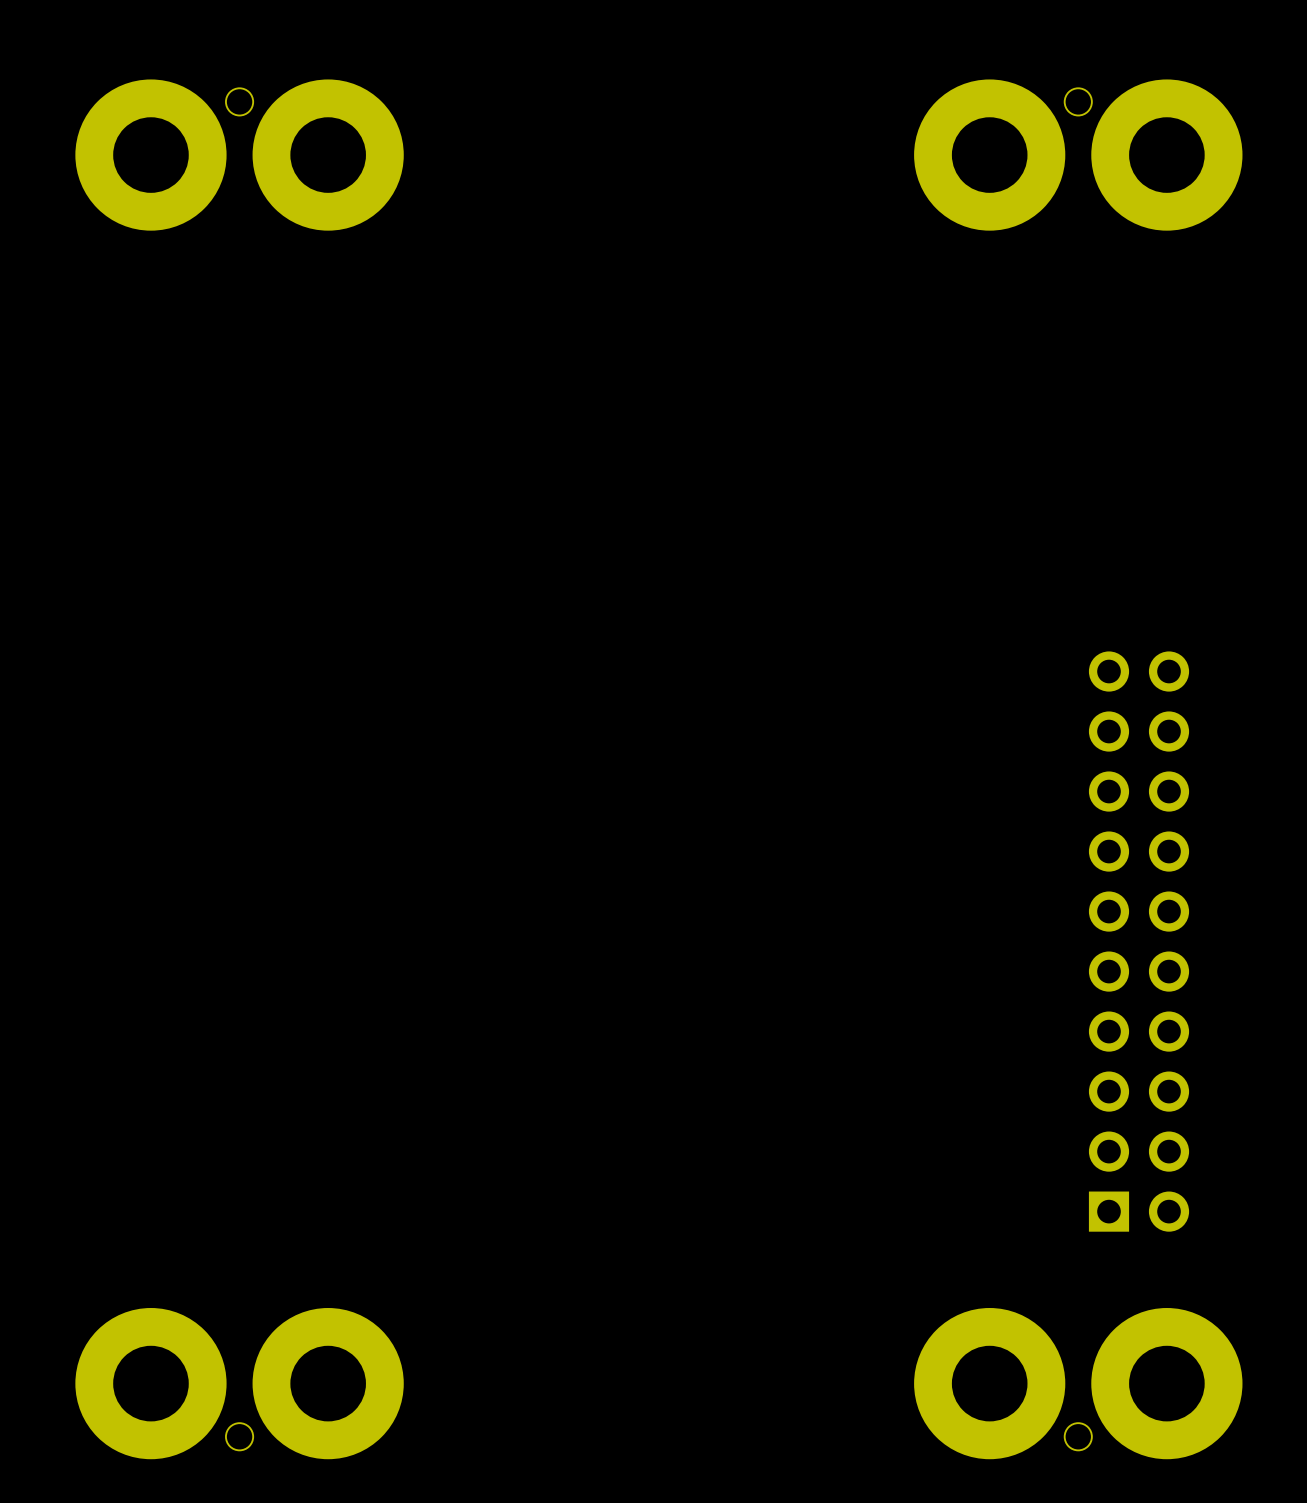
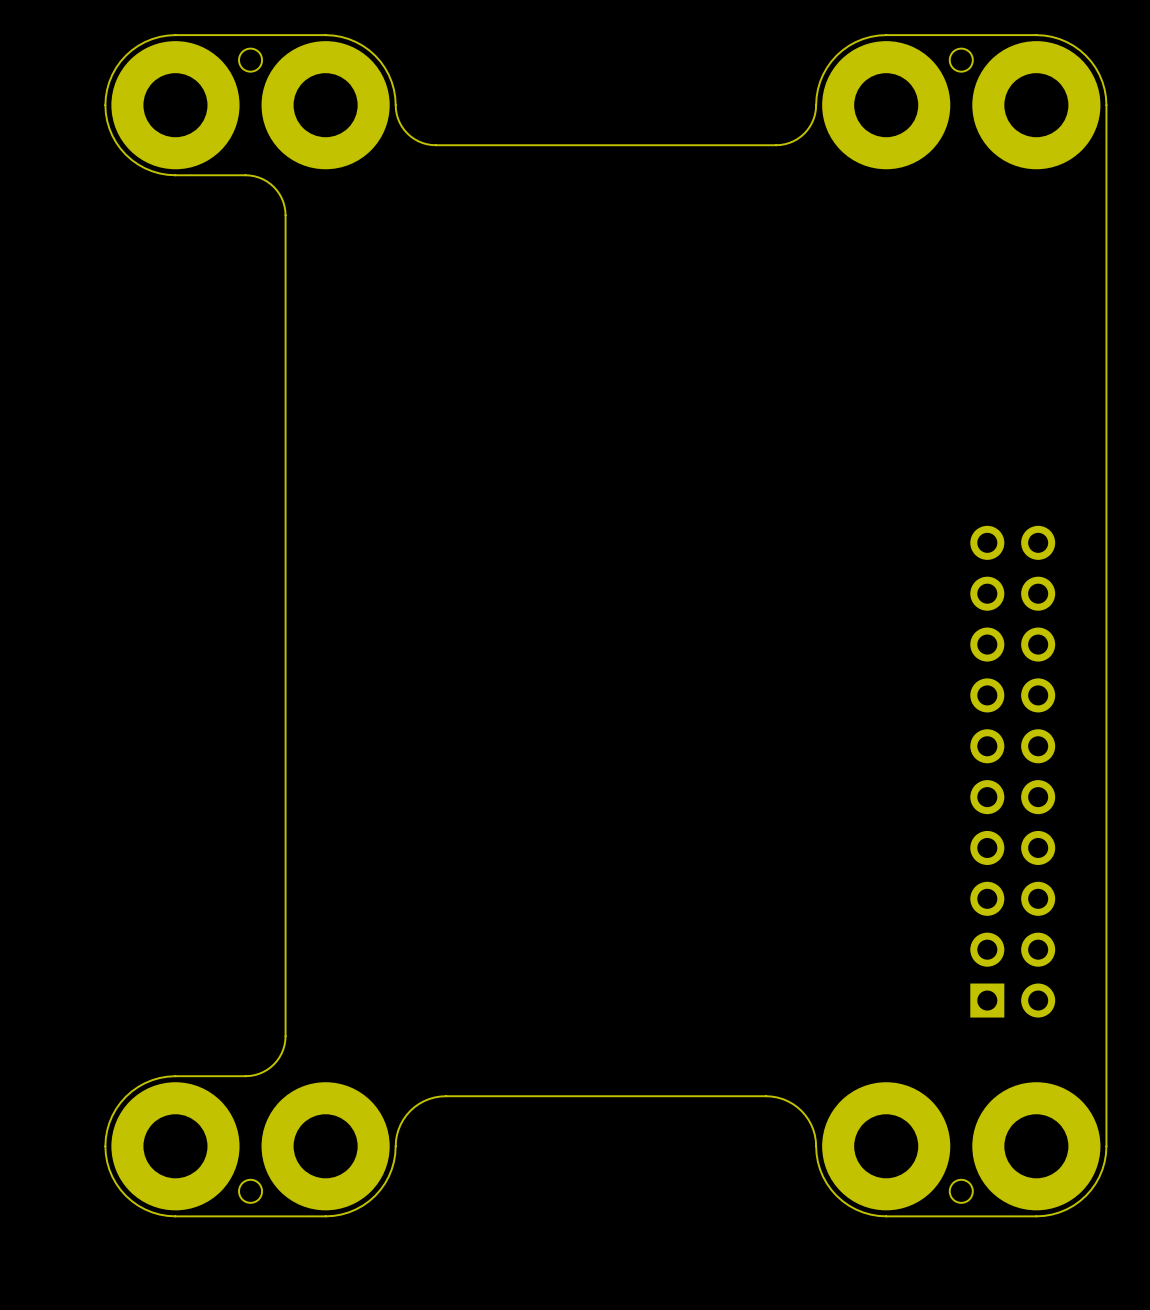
board edge: none -> (1036, 35) (886, 35) (870, 36) (855, 42) (836, 55) (823, 74) (817, 89) (815, 114) (807, 130) (793, 141) (776, 145) (426, 144) (414, 139) (401, 126) (396, 114) (391, 82) (380, 61) (369, 50) (356, 42) (333, 35) (167, 35) (145, 42) (131, 50) (120, 61) (109, 82) (105, 97) (105, 113) (112, 135) (125, 154) (138, 164) (159, 173) (245, 175) (258, 177) (270, 184) (279, 194) (283, 202) (285, 215) (285, 1040) (283, 1049) (276, 1061) (270, 1067) (258, 1073) (245, 1076) (159, 1077) (138, 1086) (125, 1096) (116, 1109) (109, 1123) (105, 1138) (105, 1154) (112, 1176) (120, 1189) (131, 1201) (152, 1212) (175, 1216) (325, 1216) (348, 1212) (369, 1201) (384, 1183) (393, 1161) (398, 1129) (406, 1115) (424, 1101) (445, 1096) (777, 1097) (792, 1103) (808, 1119) (814, 1135) (820, 1169) (831, 1189) (842, 1201) (855, 1209) (878, 1215) (1044, 1215) (1066, 1209) (1080, 1201) (1091, 1189) (1102, 1169) (1106, 1146) (1106, 105) (1104, 89) (1099, 74) (1085, 55) (1073, 45) (1059, 39) (1036, 35)

